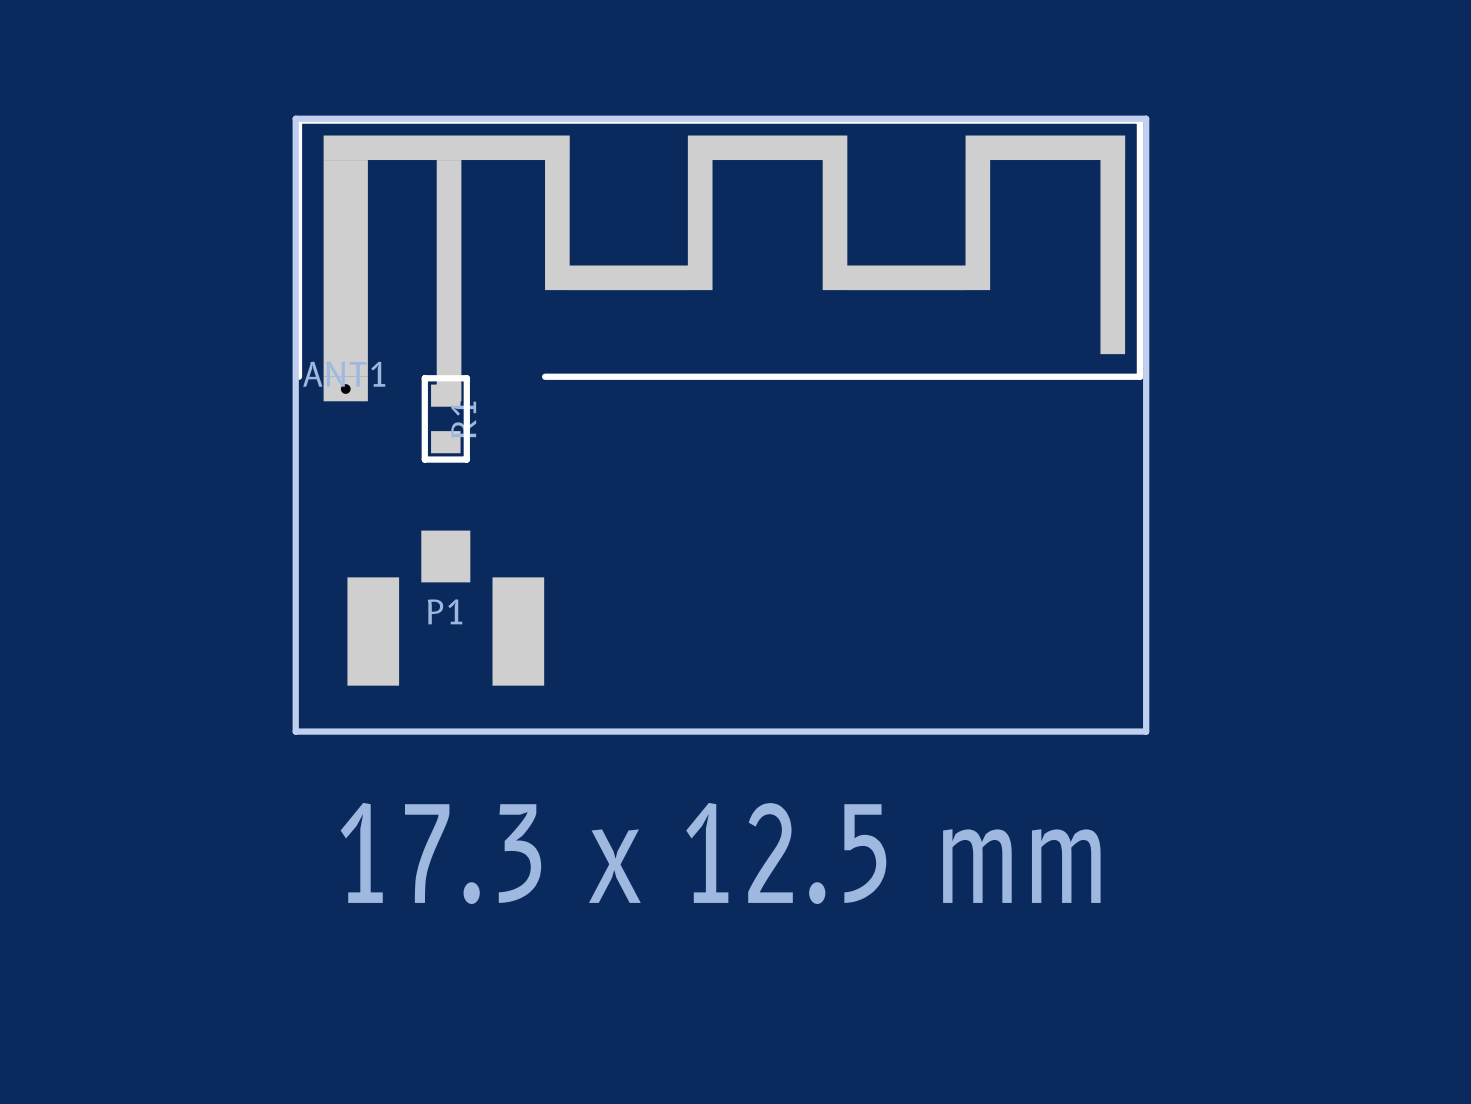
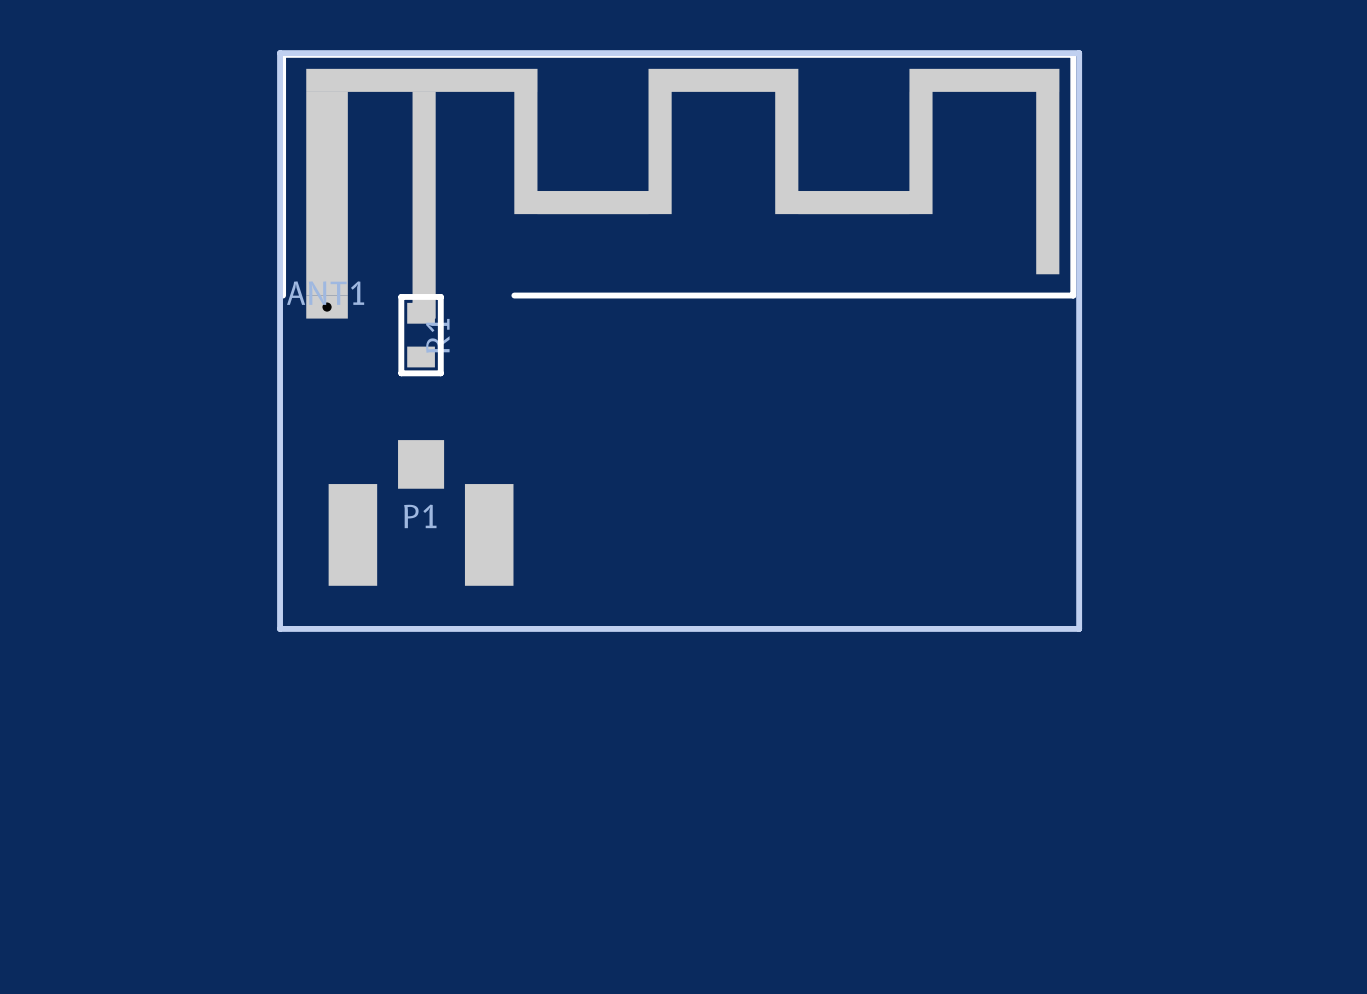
text: 17.3 x 12.5 mm (720, 853) -> none

